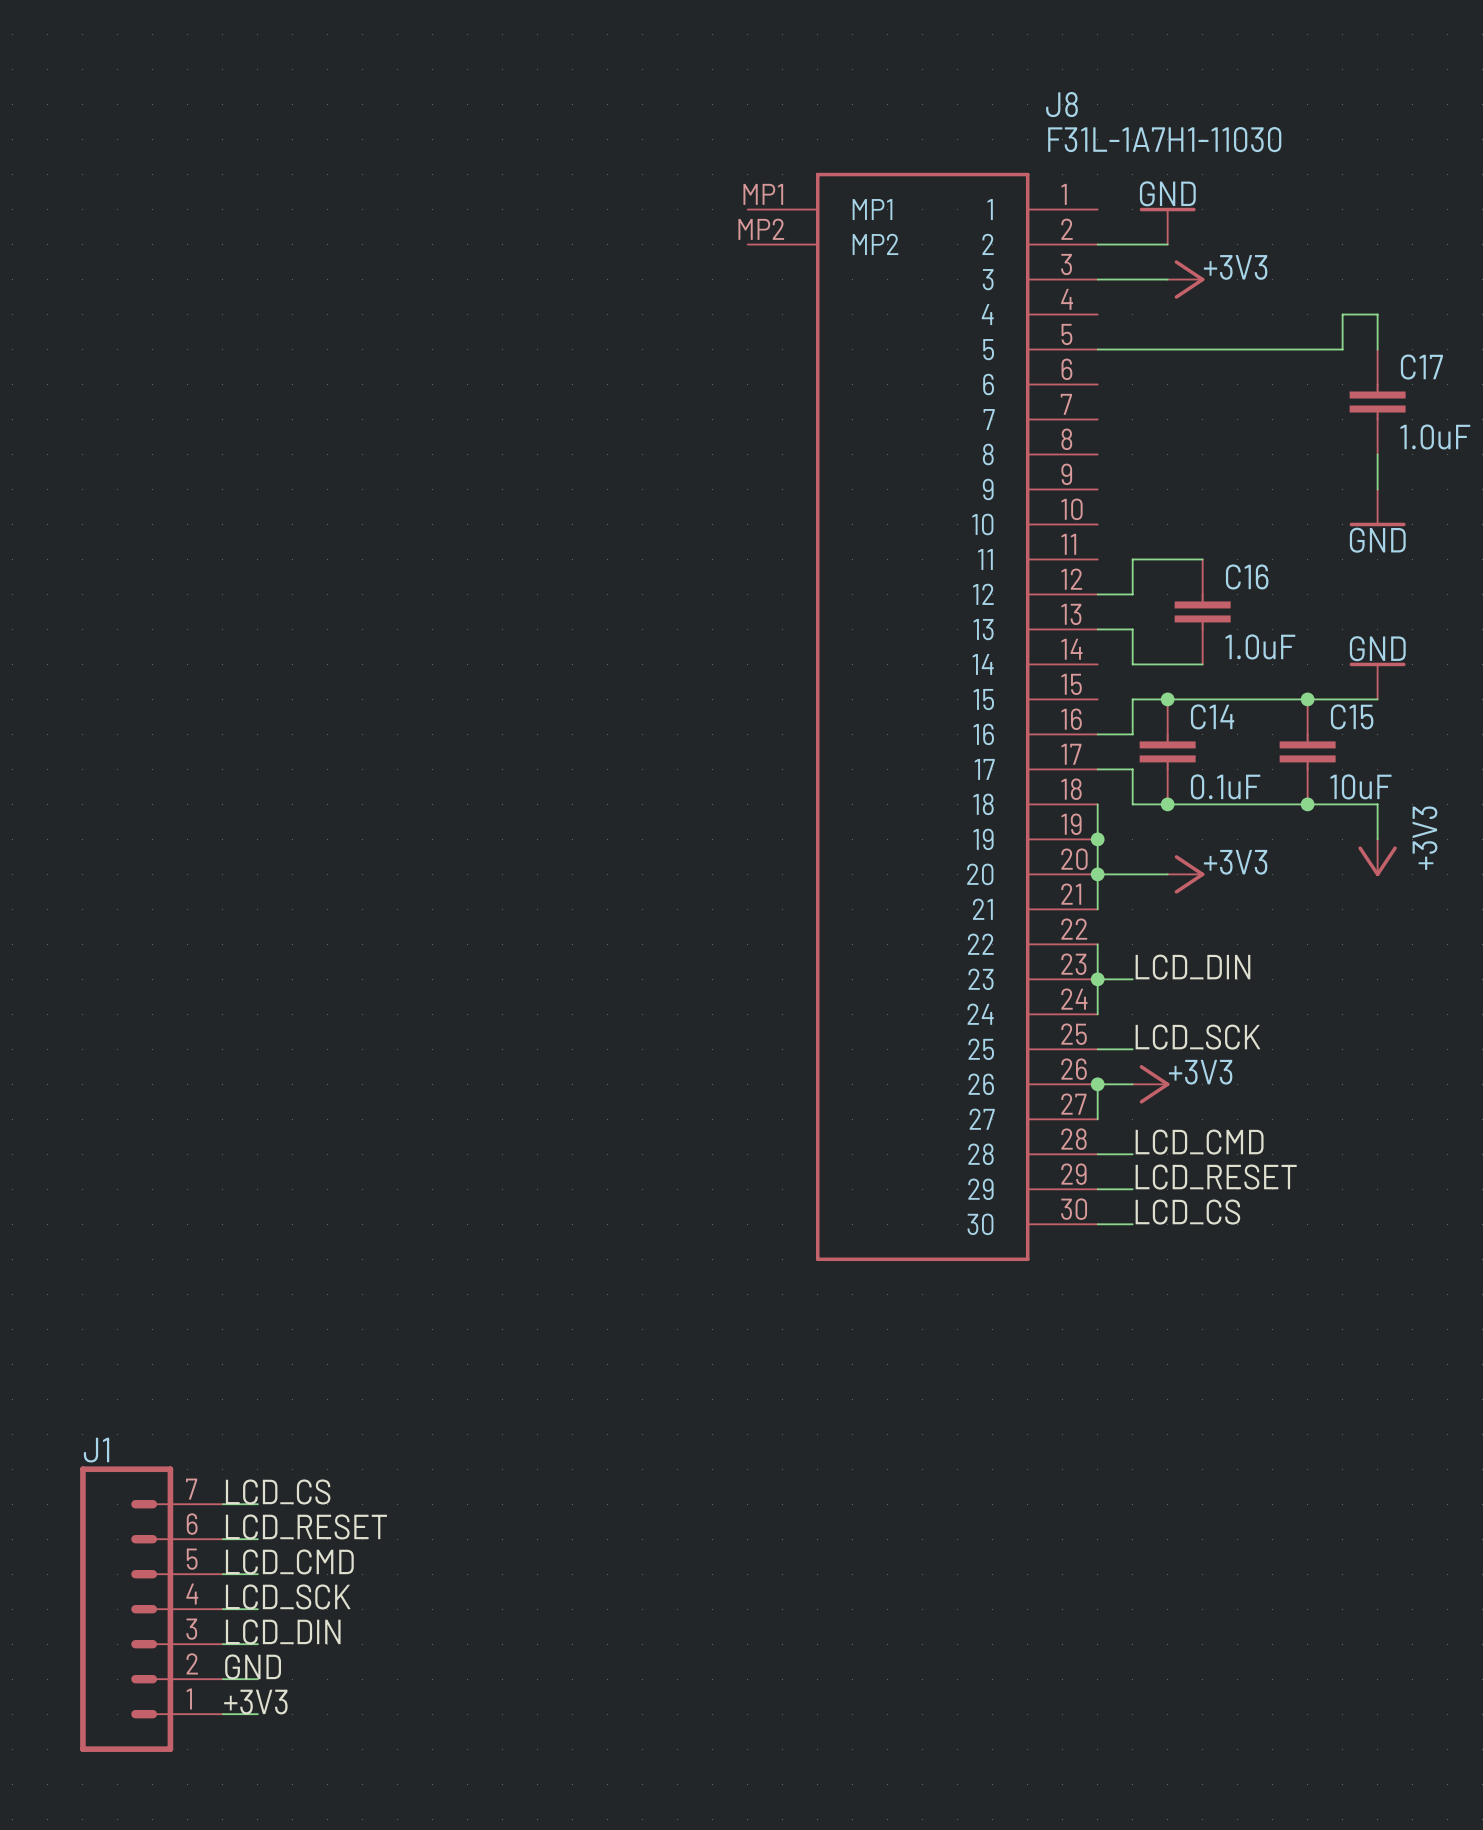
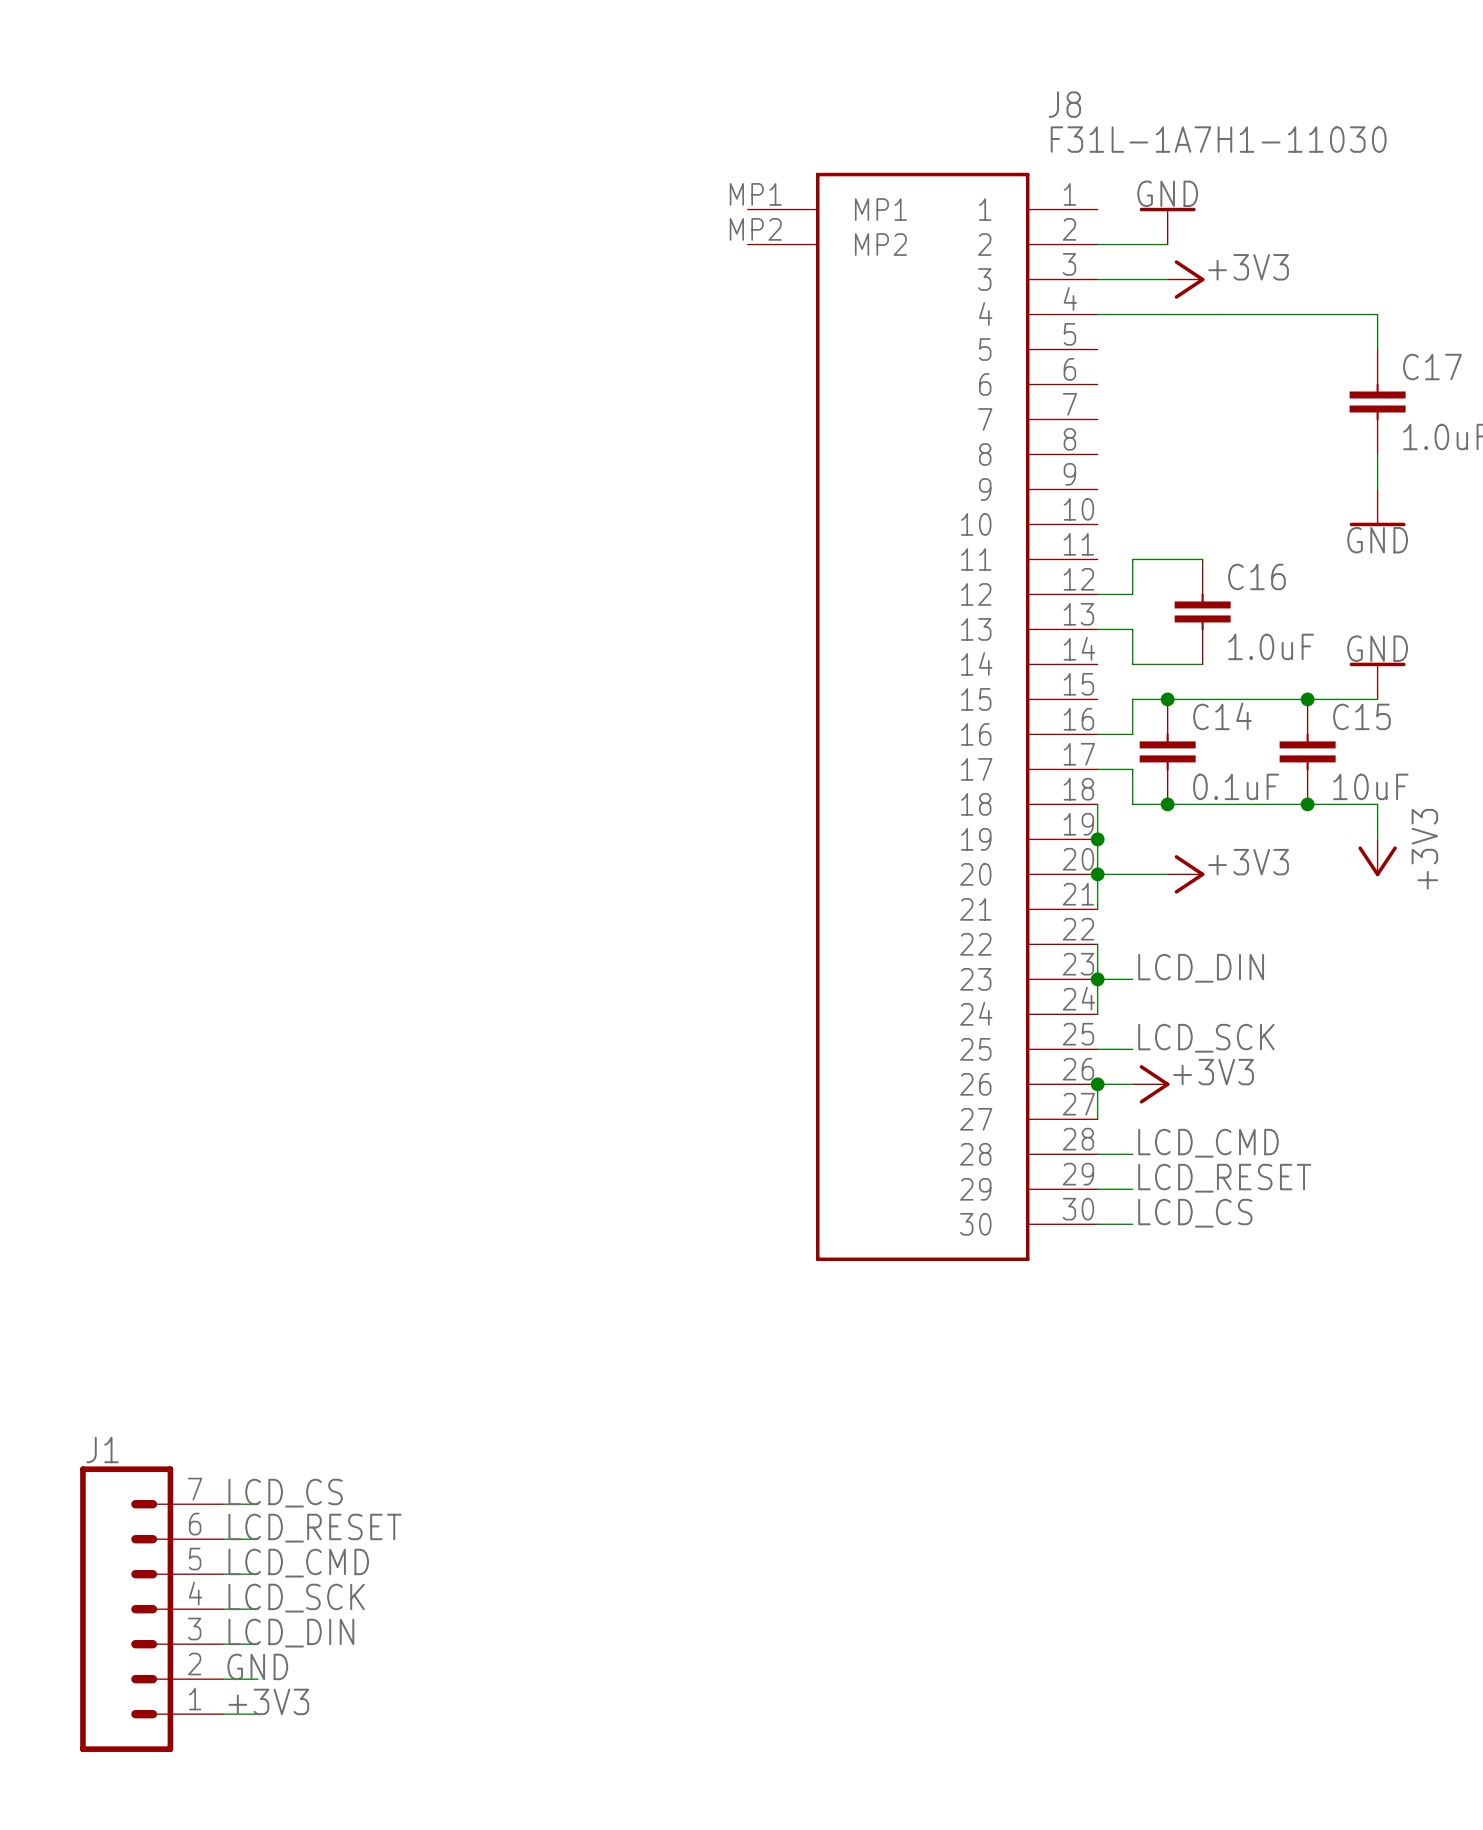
wire: (1342, 314) (1342, 349) (1097, 349) -> (1342, 314) (1097, 314)

